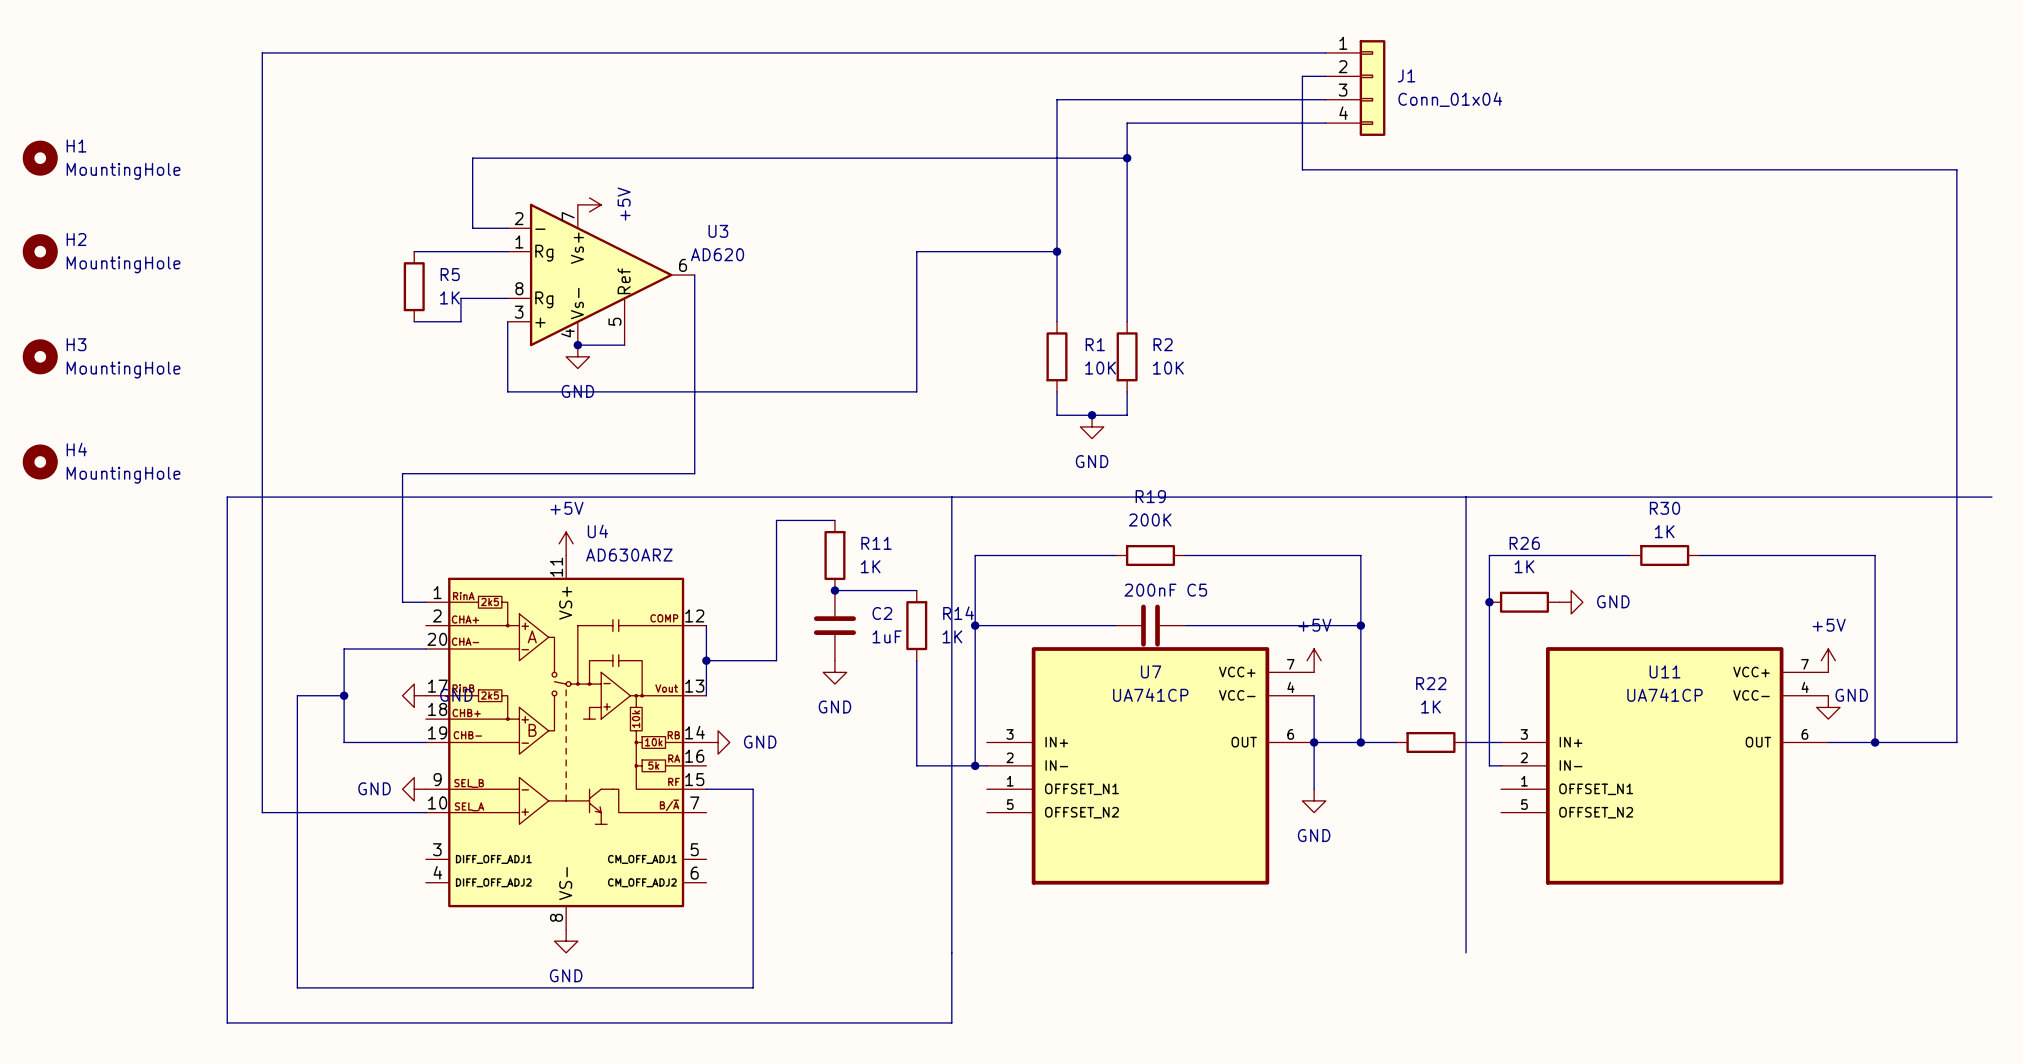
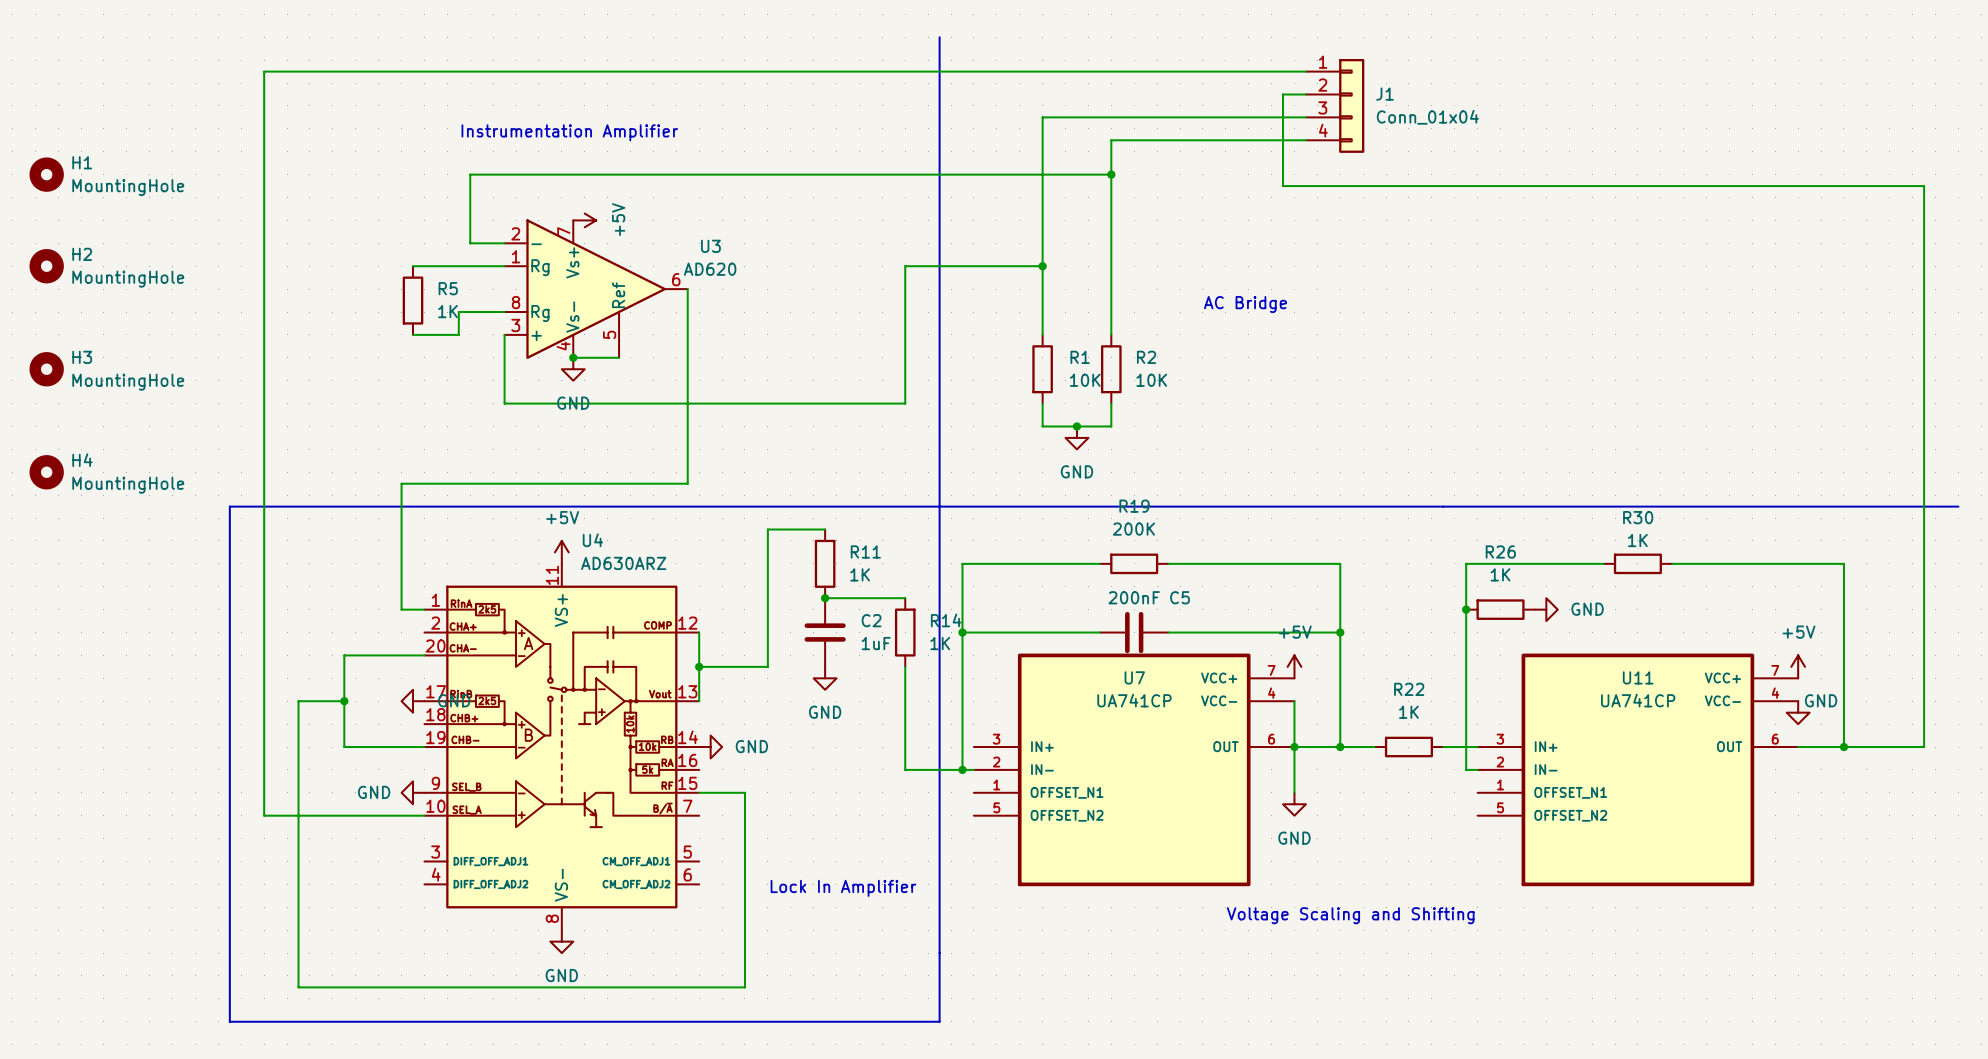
line: none -> (939, 37) (939, 506)
text: none -> Instrumentation Amplifier (569, 132)
text: none -> AC Bridge (1245, 304)
line: (1466, 497) (1466, 952) -> none
text: none -> Lock In Amplifier (843, 888)
text: none -> Voltage Scaling and Shifting (1350, 915)

